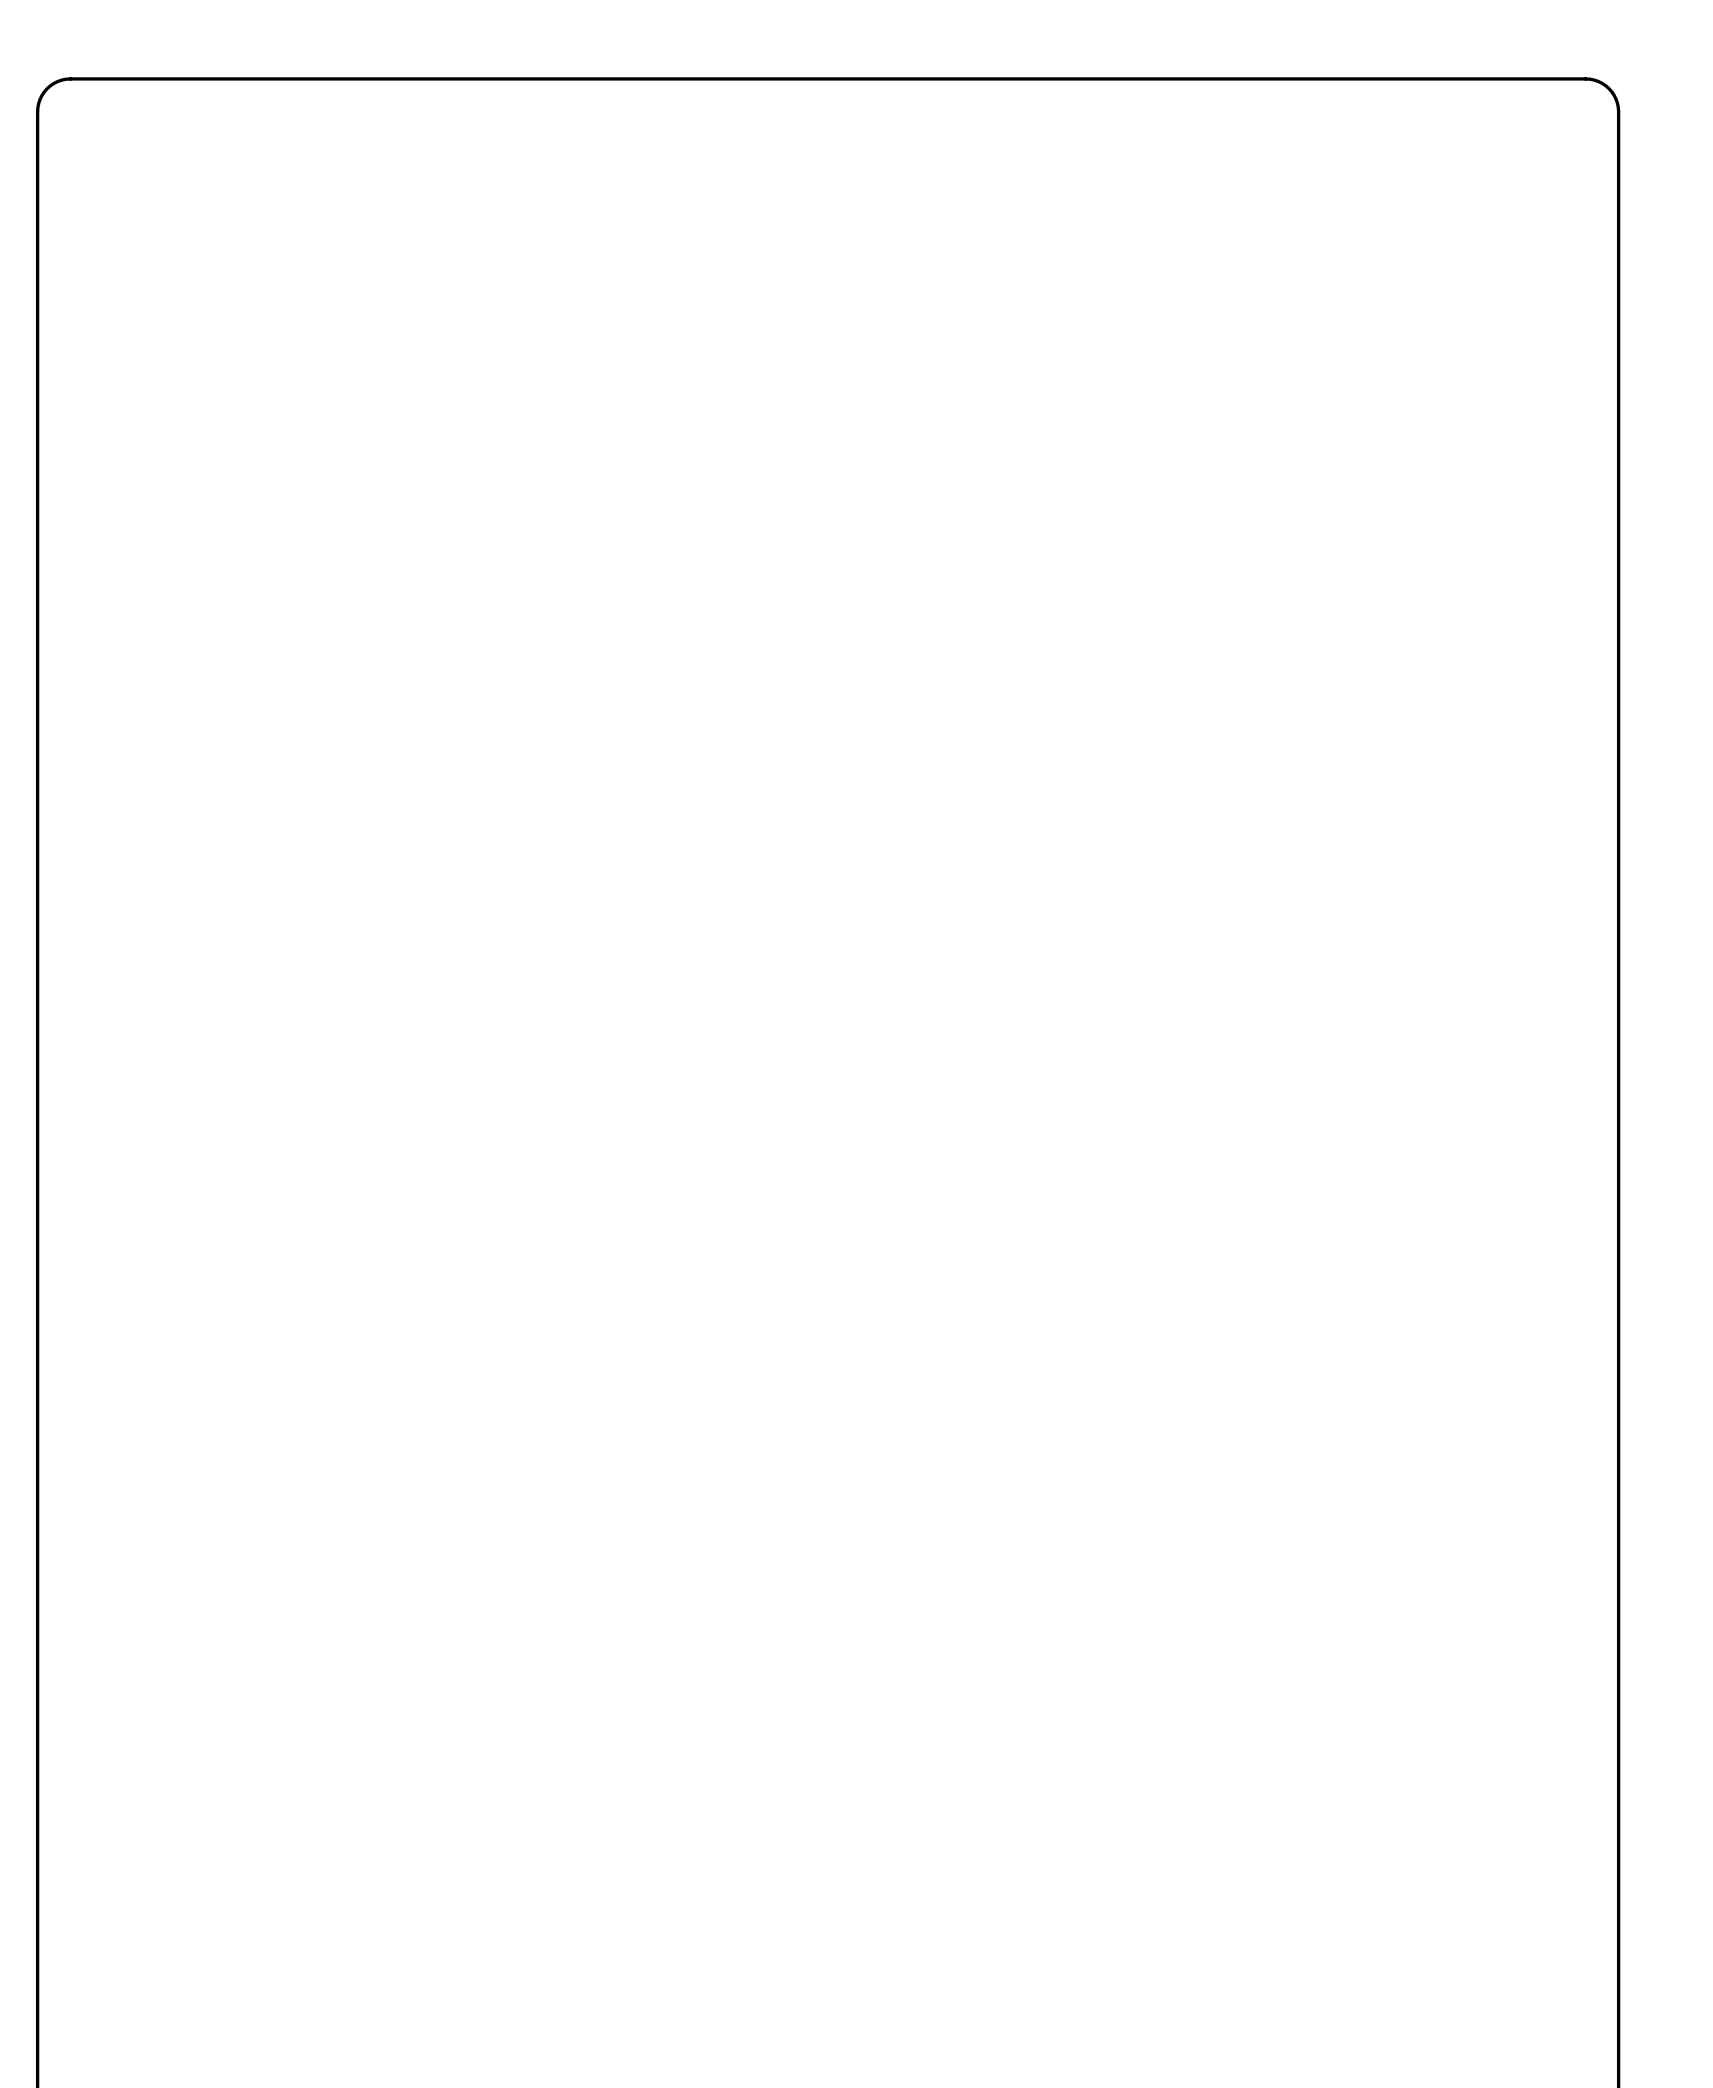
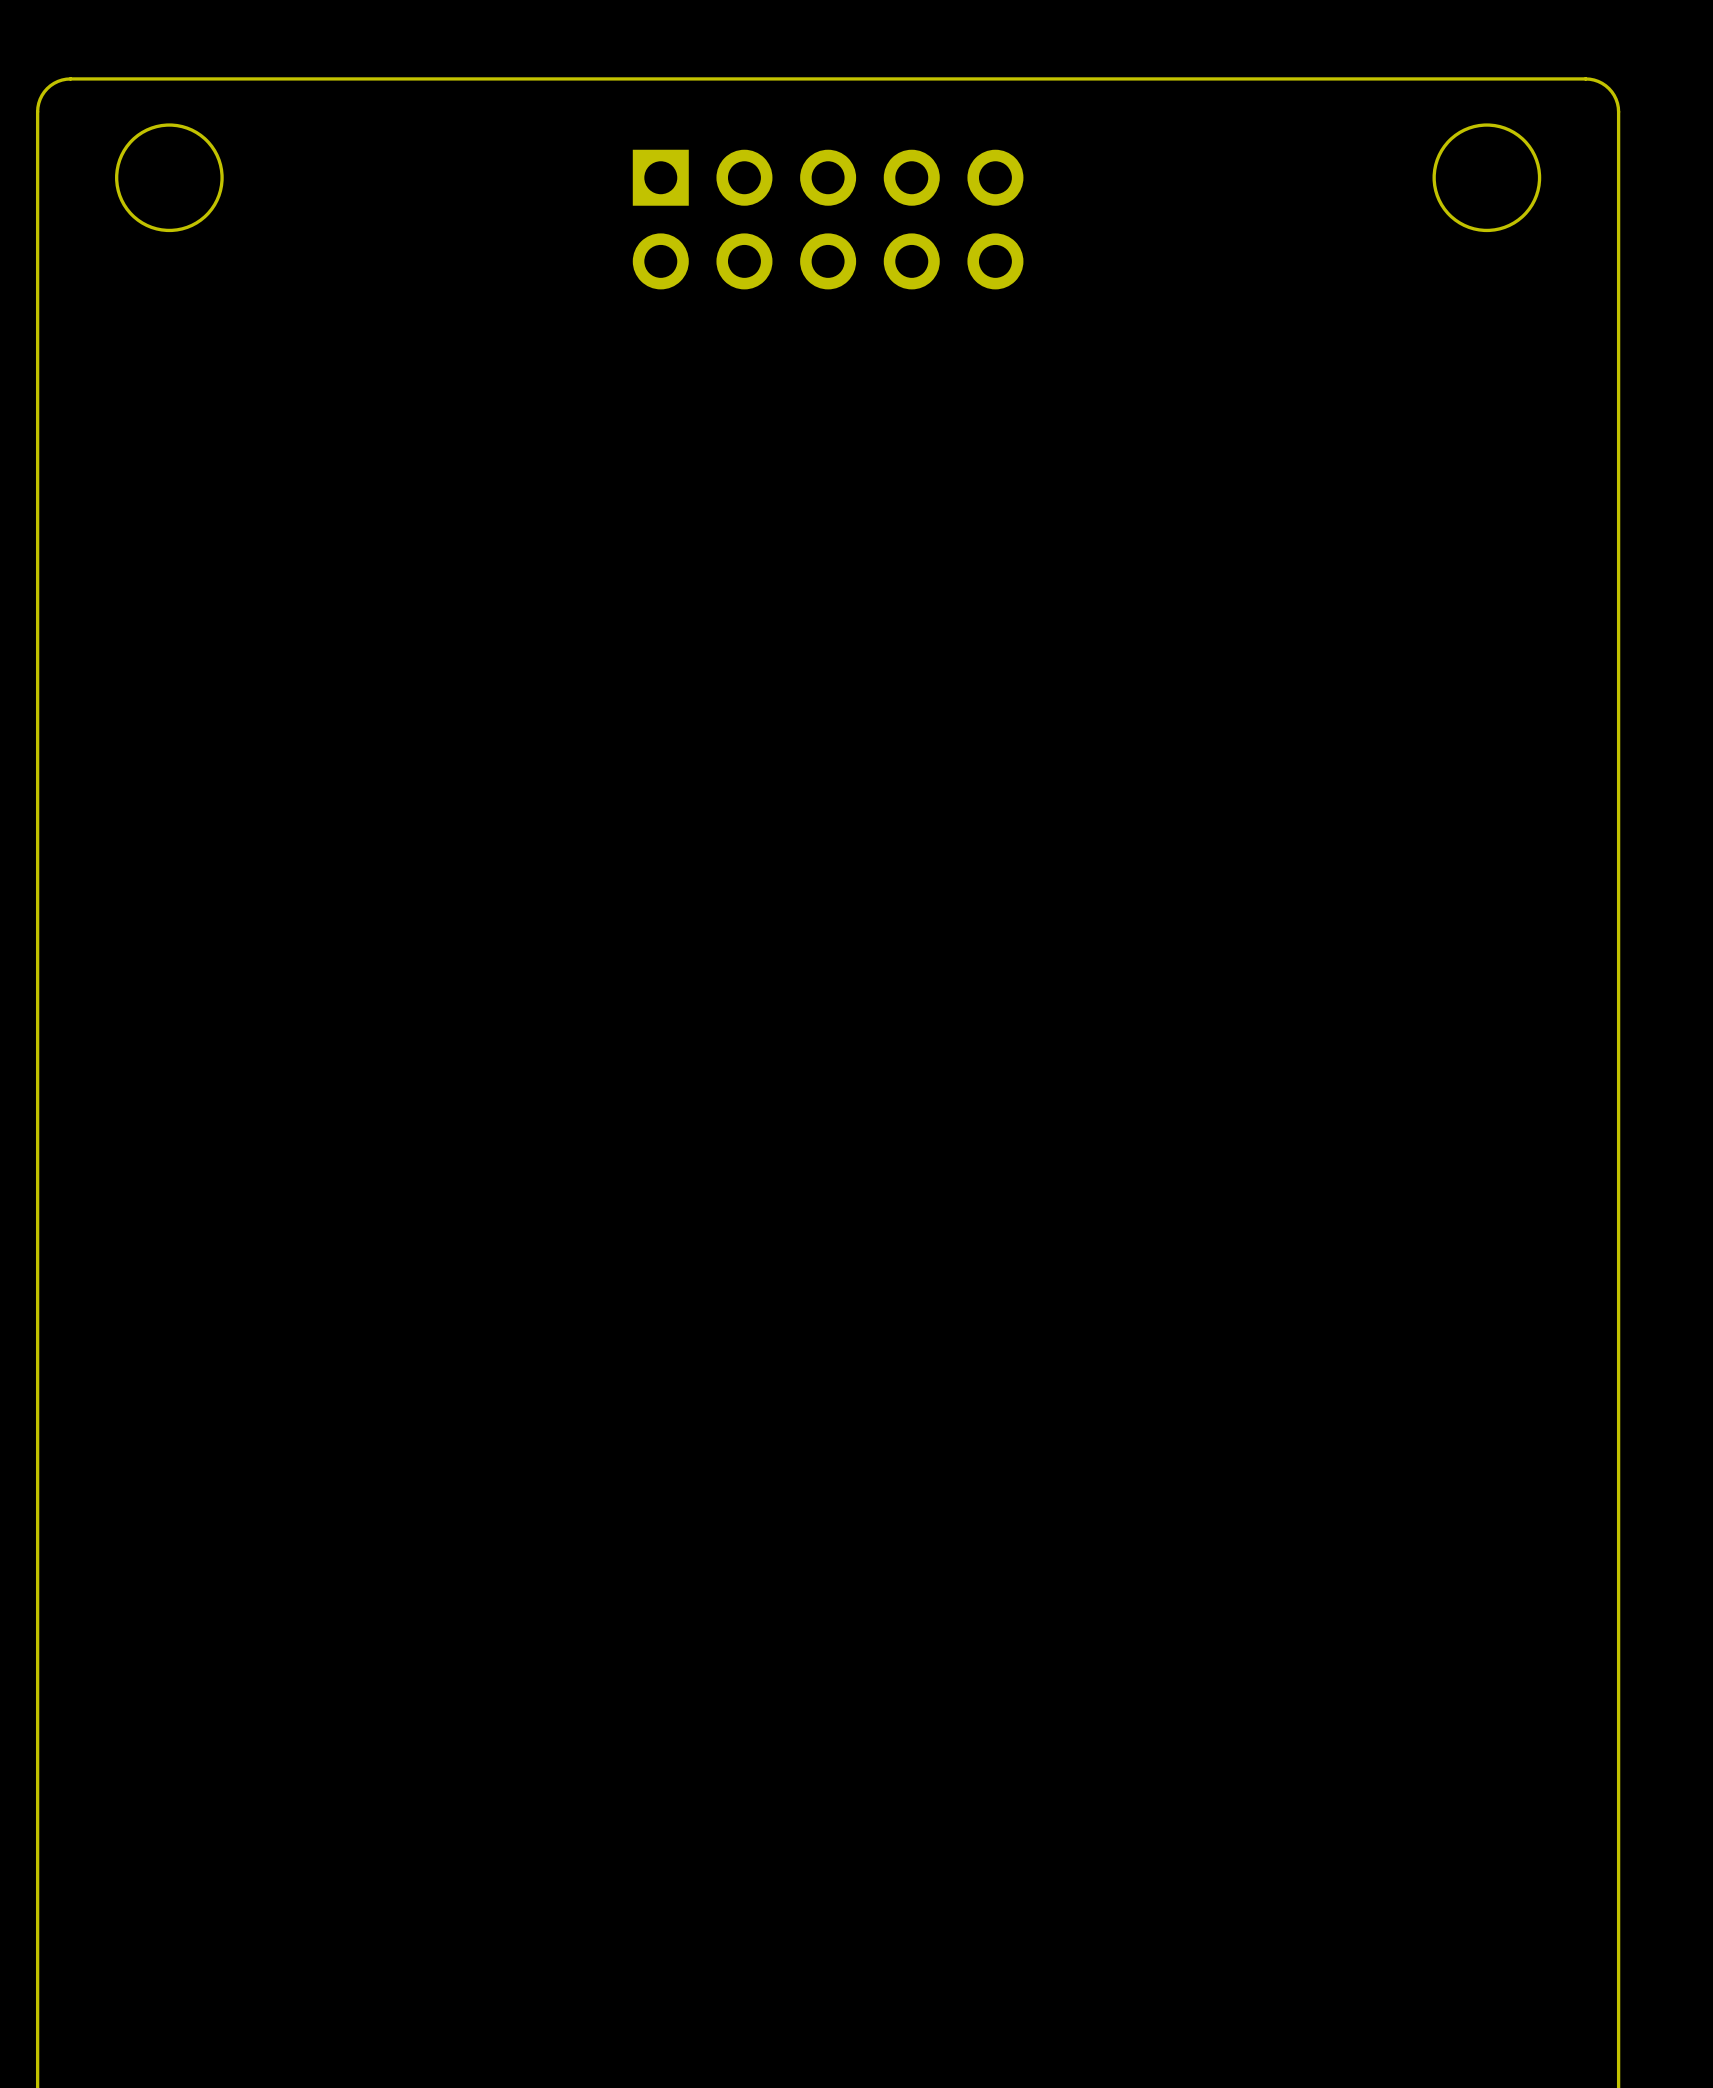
round board edge: none -> [115, 123, 224, 233]
round board edge: none -> [1432, 123, 1542, 233]
part: none -> (828, 219)

